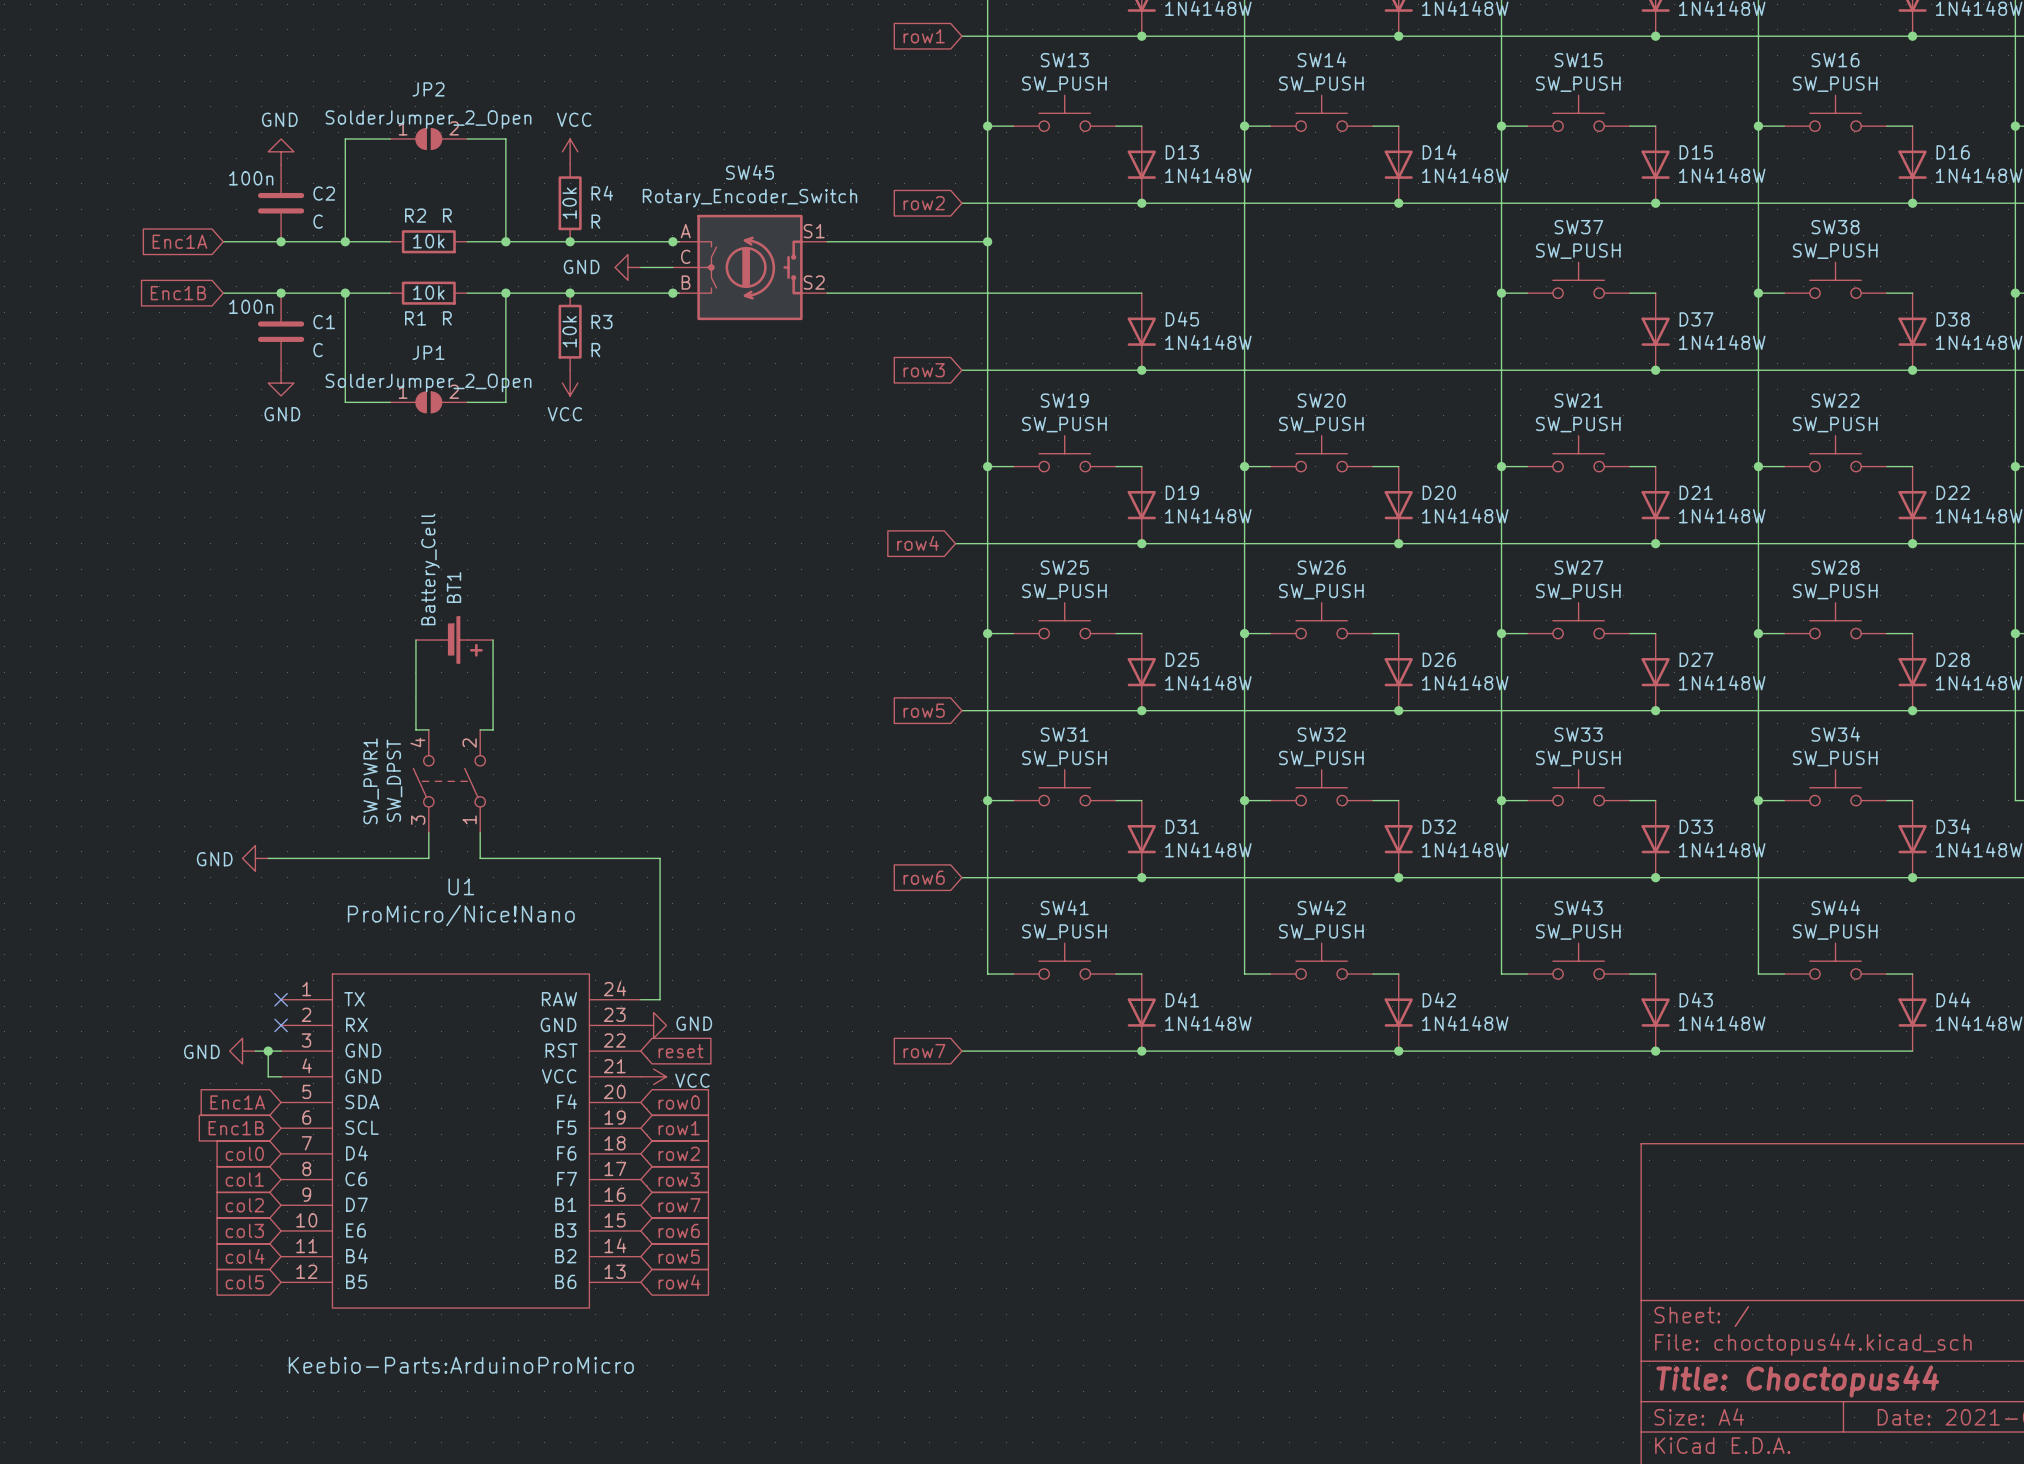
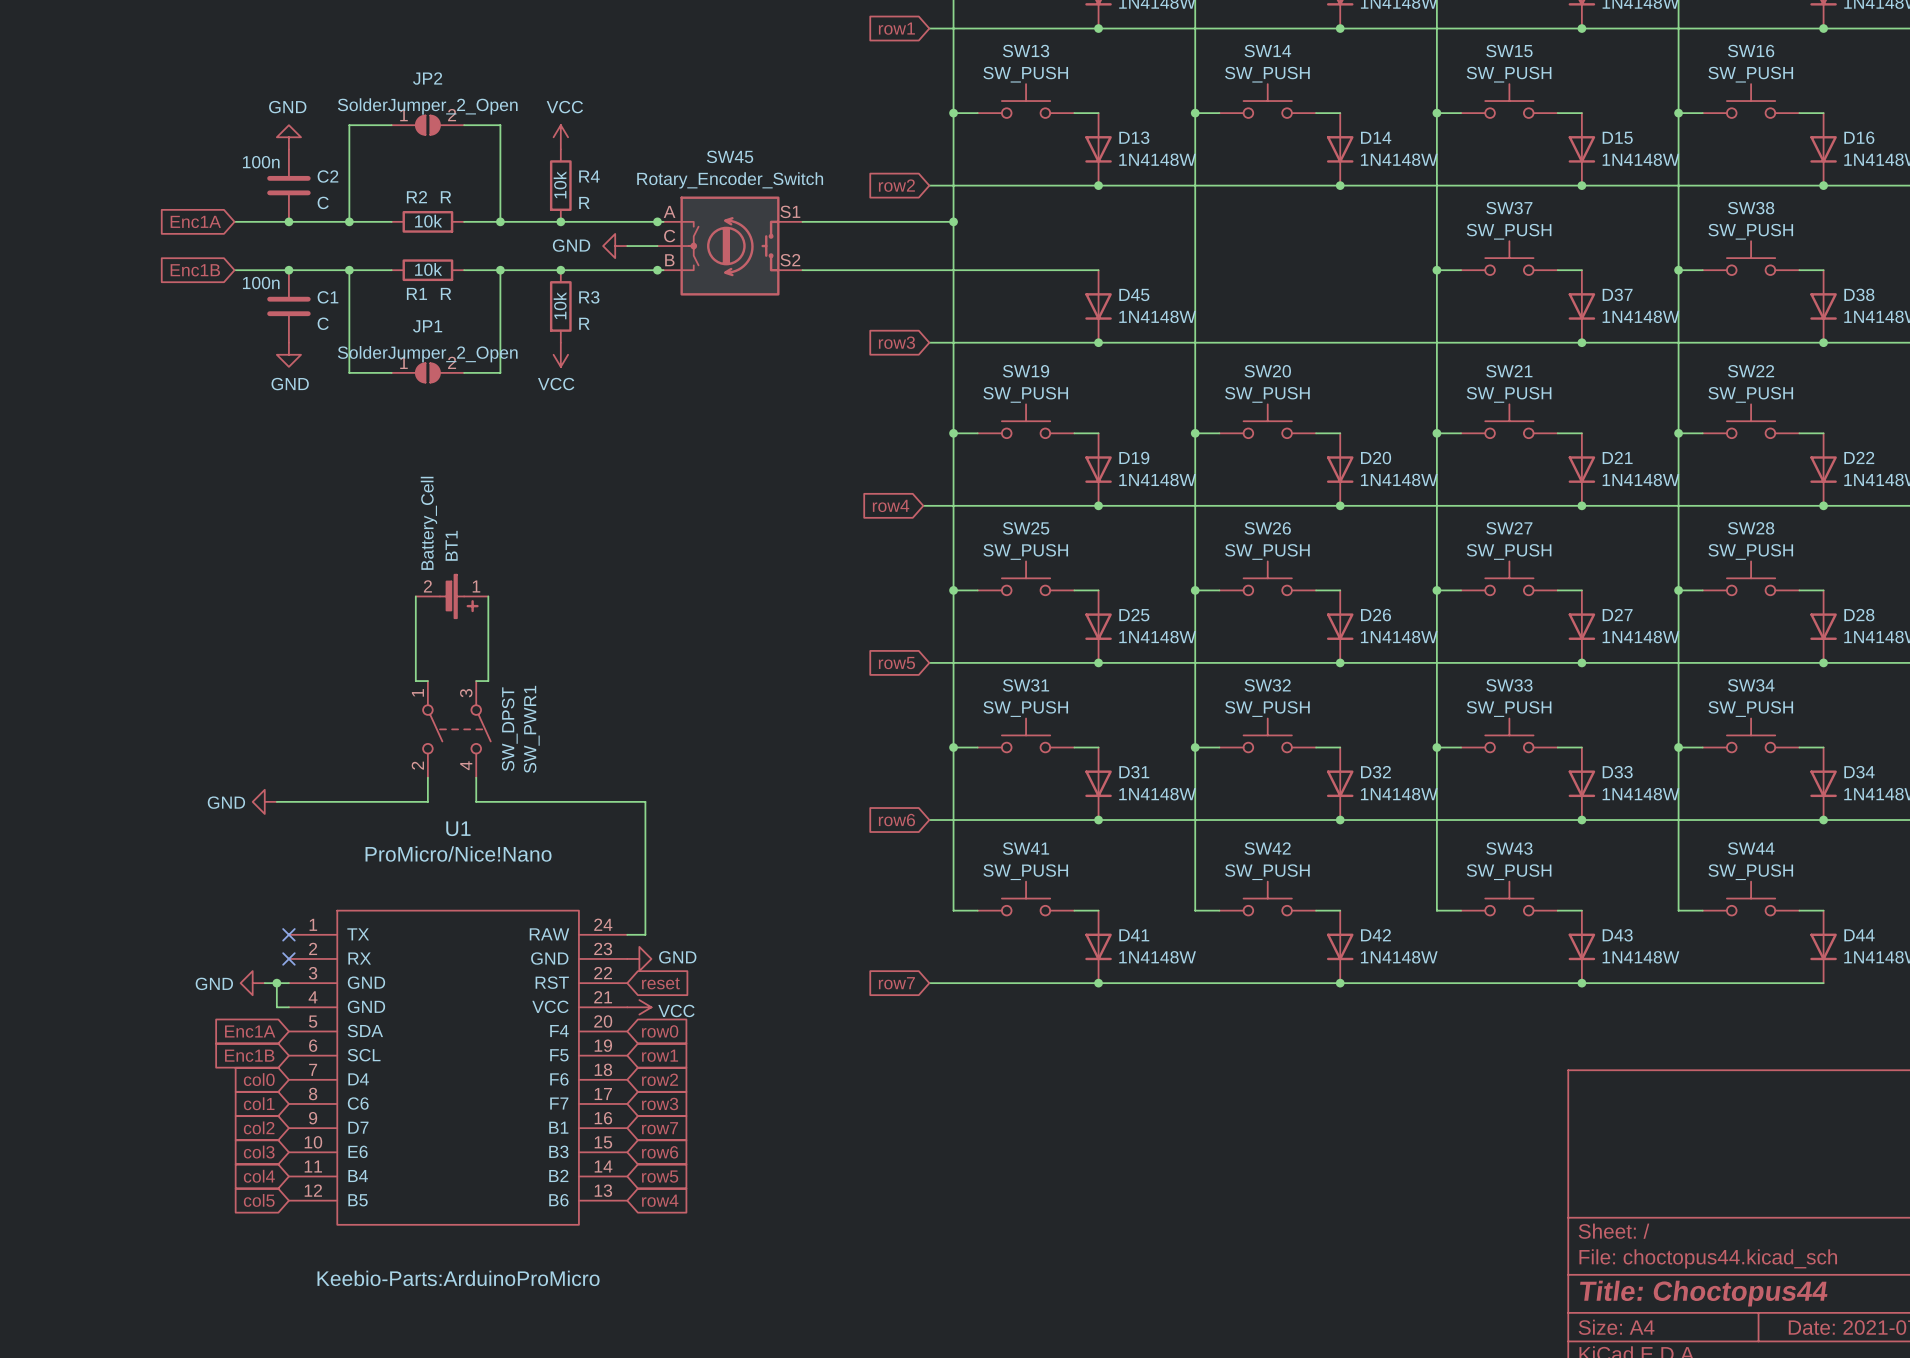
BT1 pin number: none -> 2 (427, 586)
BT1 pin number: none -> 1 (476, 586)
SW_PWR1 rotation: 0° (449, 781) -> 180° (456, 729)

